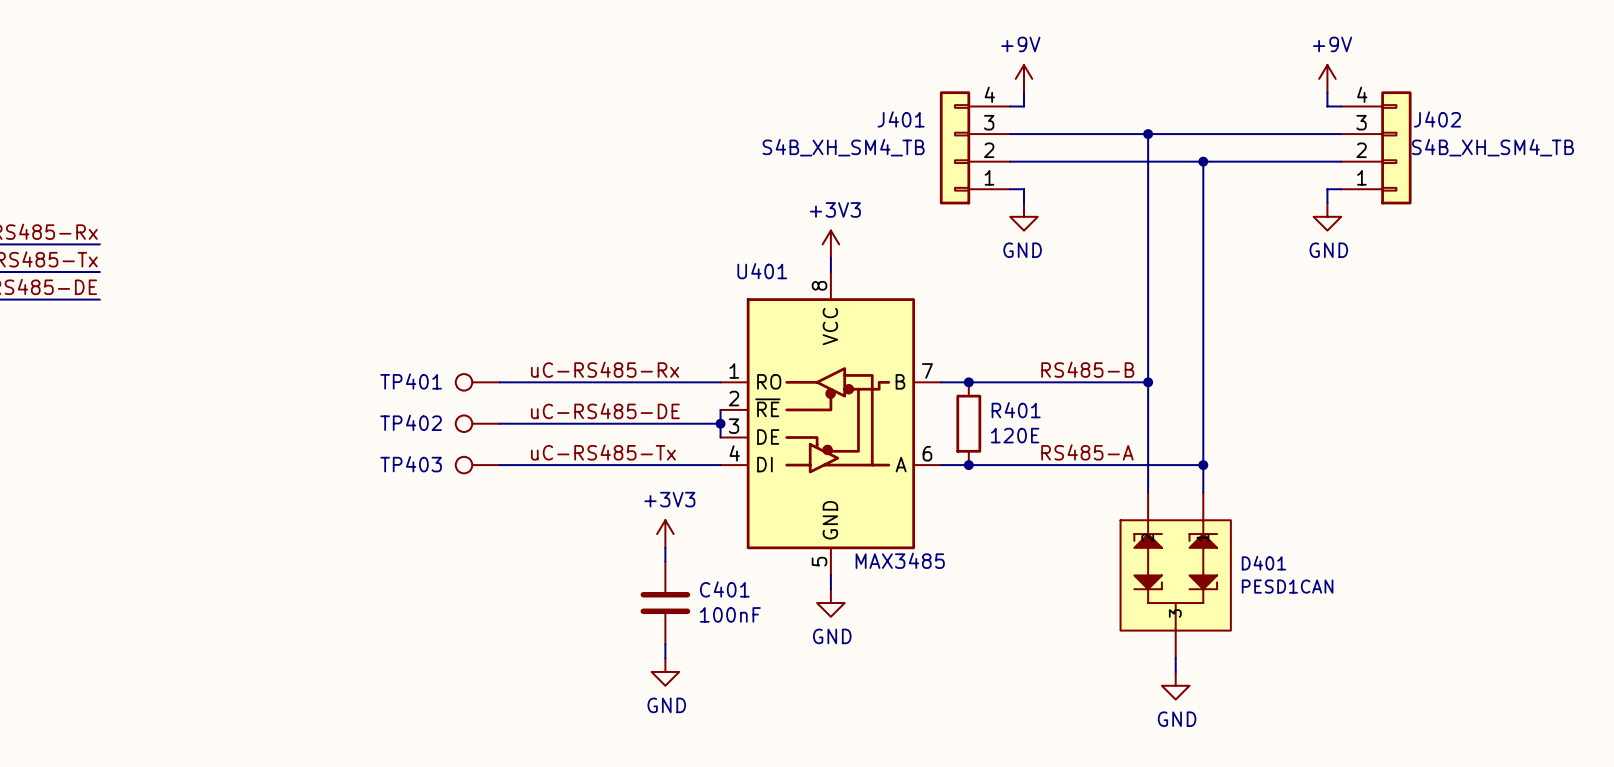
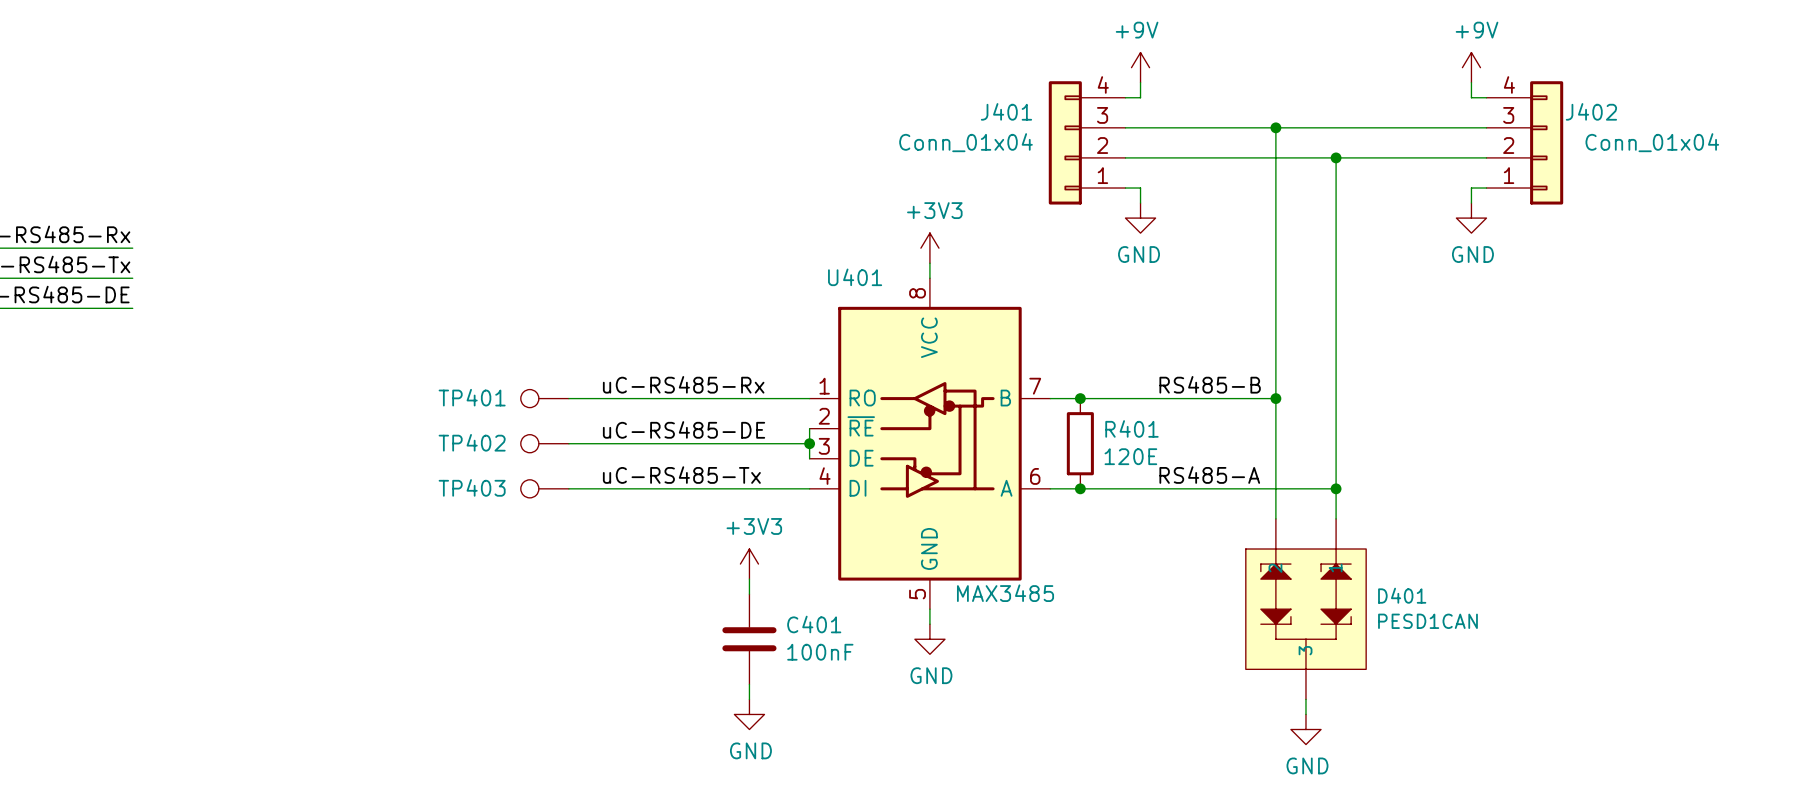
J401 value: S4B_XH_SM4_TB (843, 147) -> Conn_01x04 (966, 142)
J402 value: S4B_XH_SM4_TB (1492, 147) -> Conn_01x04 (1652, 142)

